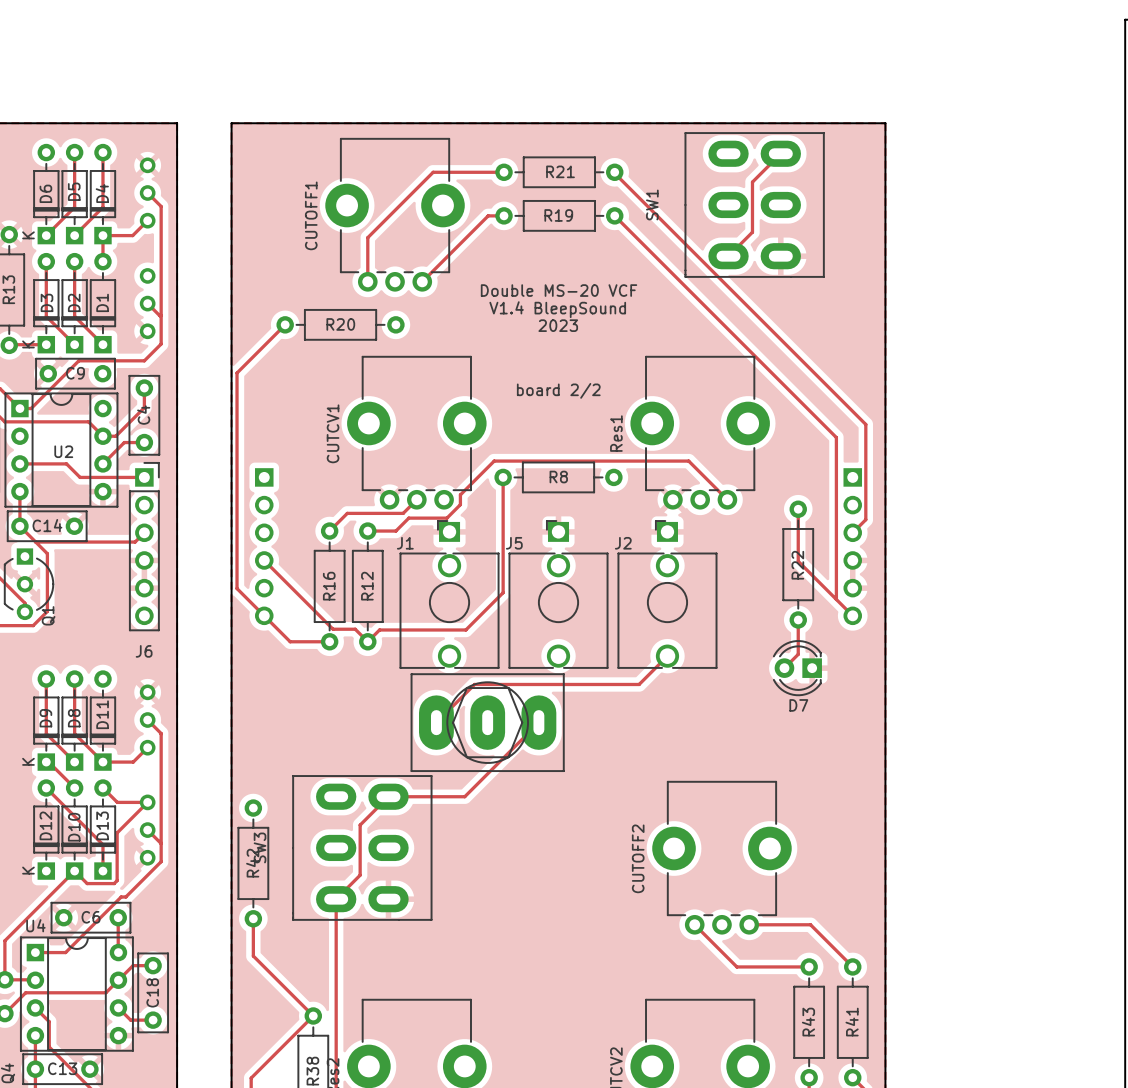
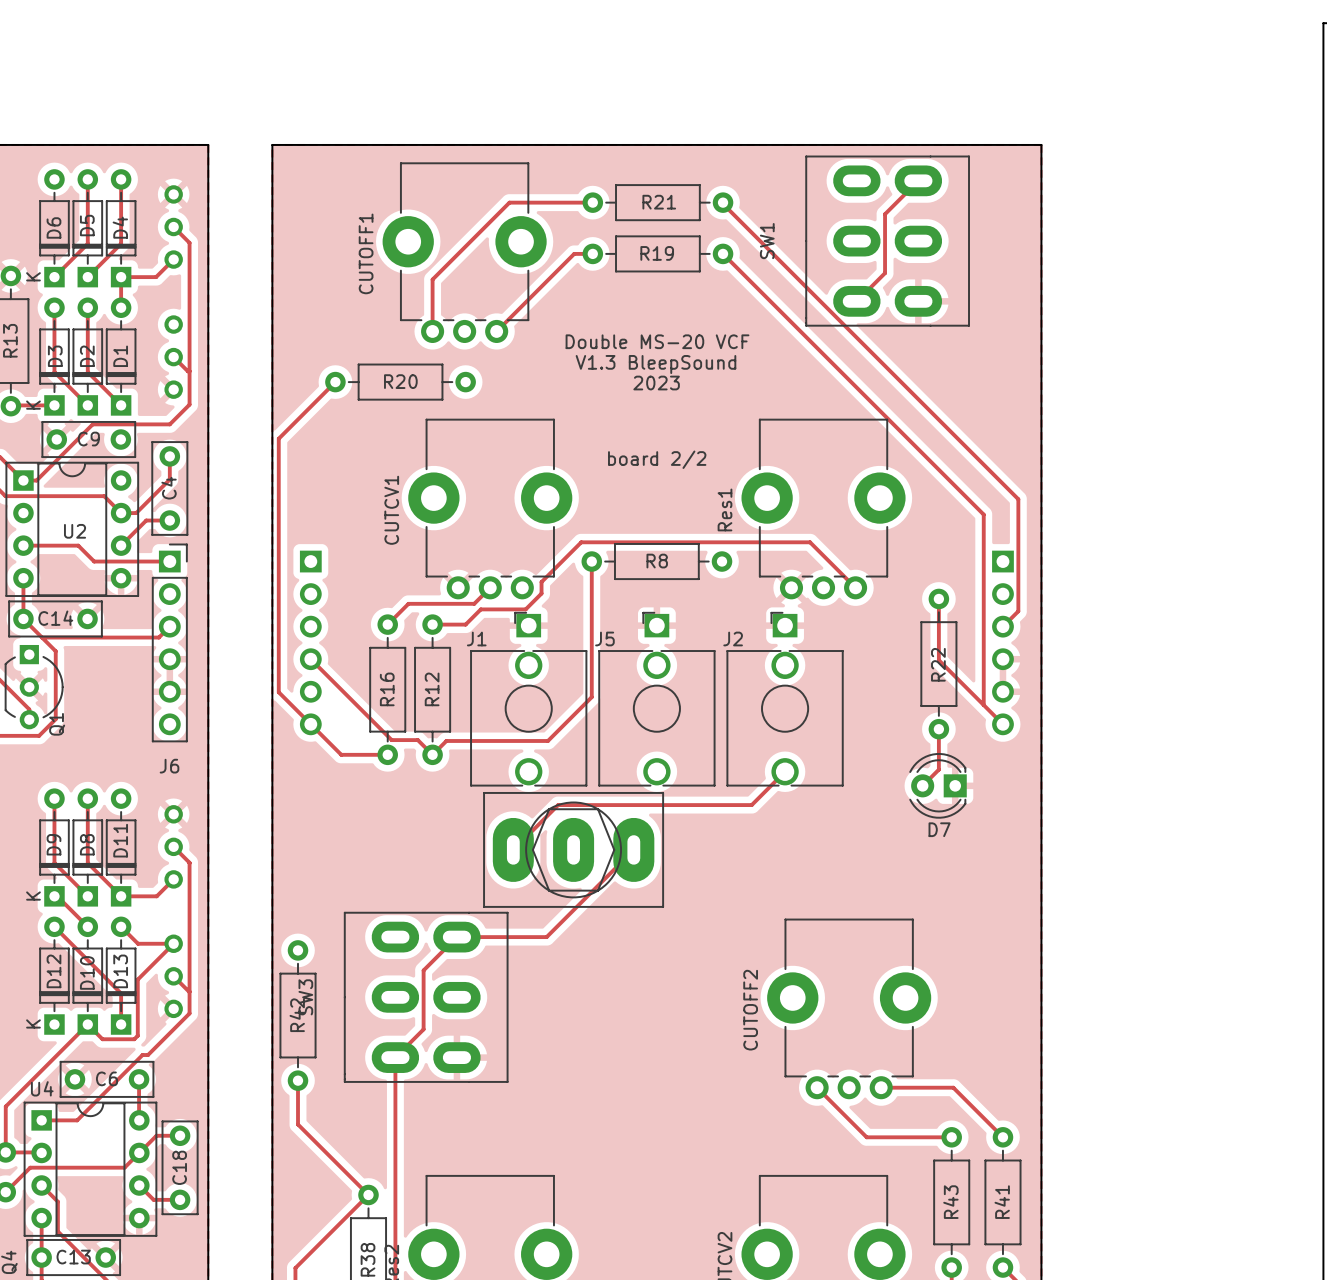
text: V1.4 BleepSound (557, 309) -> V1.3 BleepSound (655, 364)

